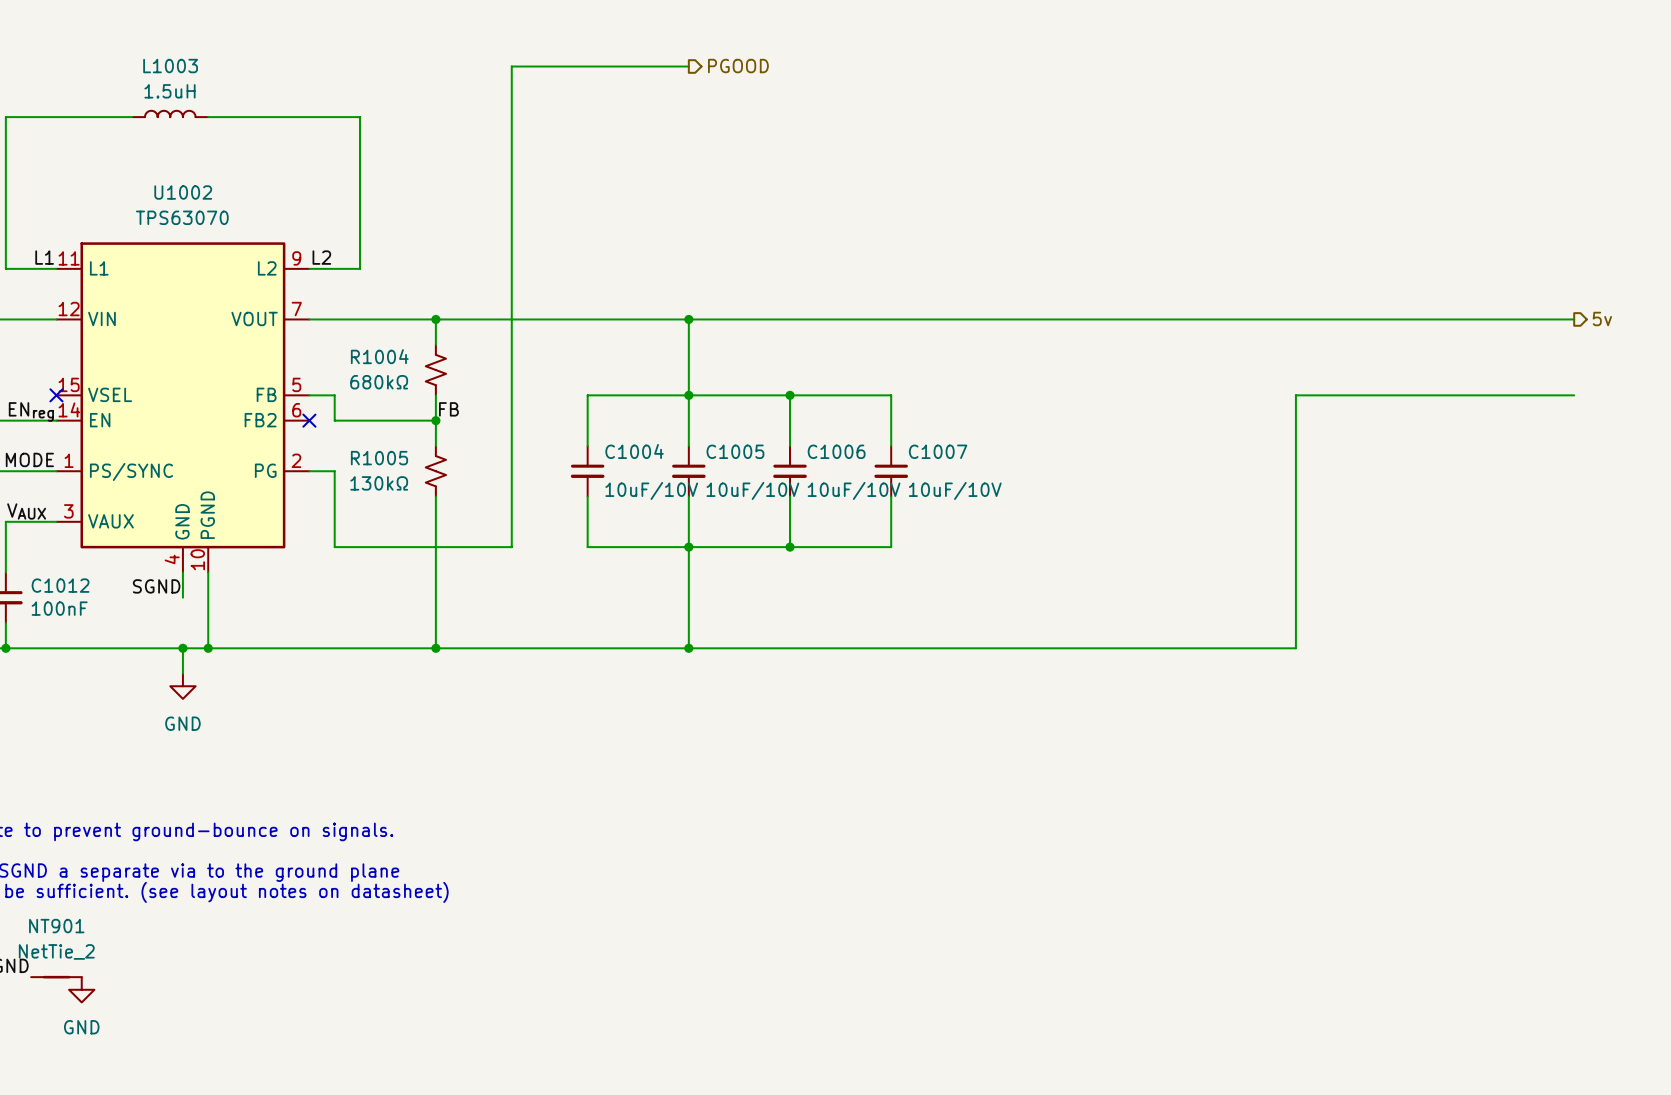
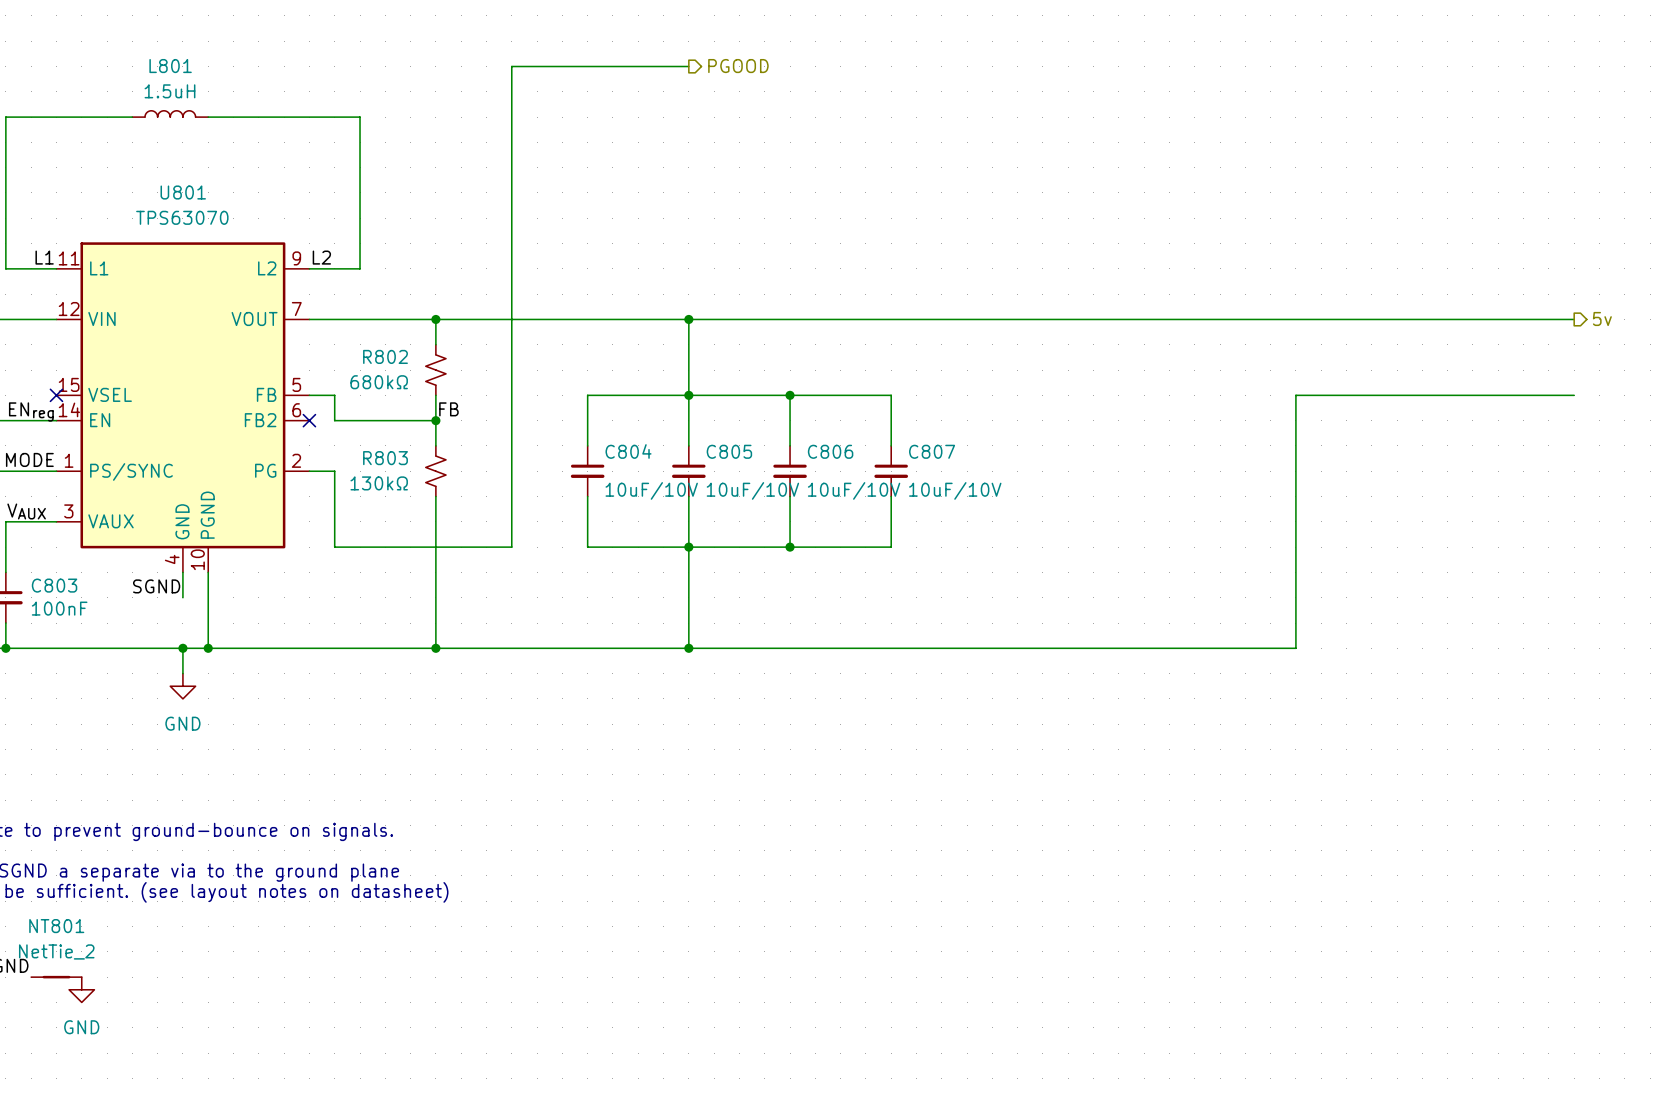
L1003 name: L1003 (170, 66) -> L801 (170, 66)
U1002 name: U1002 (183, 192) -> U801 (183, 192)
R1004 name: R1004 (379, 356) -> R802 (385, 356)
C1004 name: C1004 (634, 451) -> C804 (628, 451)
C1005 name: C1005 (735, 451) -> C805 (729, 451)
C1006 name: C1006 (836, 451) -> C806 (830, 451)
C1007 name: C1007 (938, 451) -> C807 (932, 451)
R1005 name: R1005 (379, 458) -> R803 (385, 458)
C1012 name: C1012 (60, 585) -> C803 (54, 585)
NT901 name: NT901 (56, 926) -> NT801 (56, 926)

